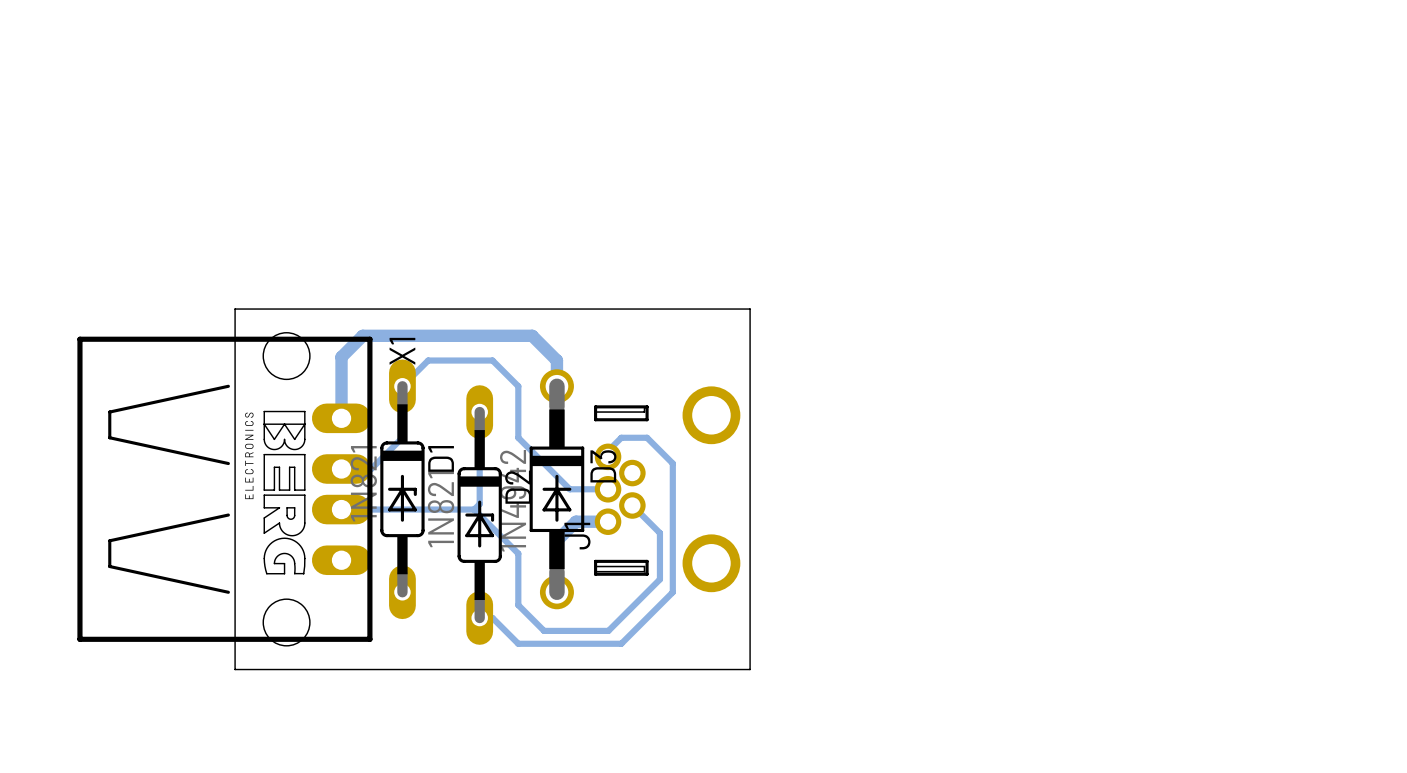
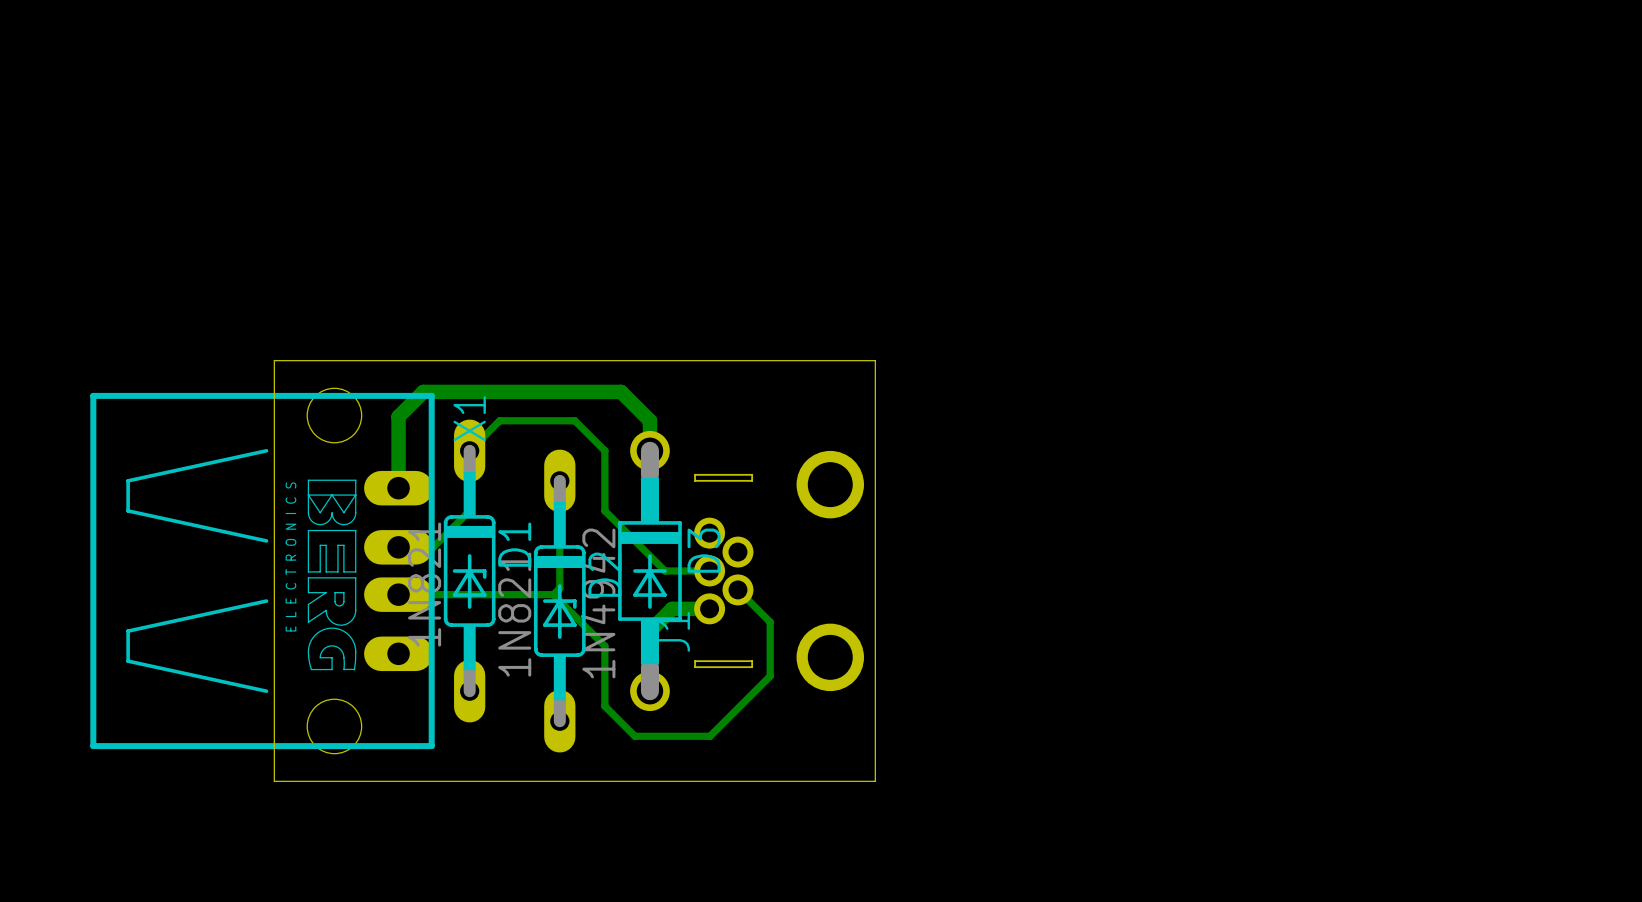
board edge: (595, 406) (595, 419) (647, 419) (647, 406) (595, 406) -> none
bottom track: (608, 456) (608, 451) (621, 437) (647, 437) (672, 463) (672, 592) (621, 643) (518, 643) (492, 618) (479, 618) -> none
board edge: (595, 561) (595, 574) (647, 574) (647, 561) (595, 561) -> none

